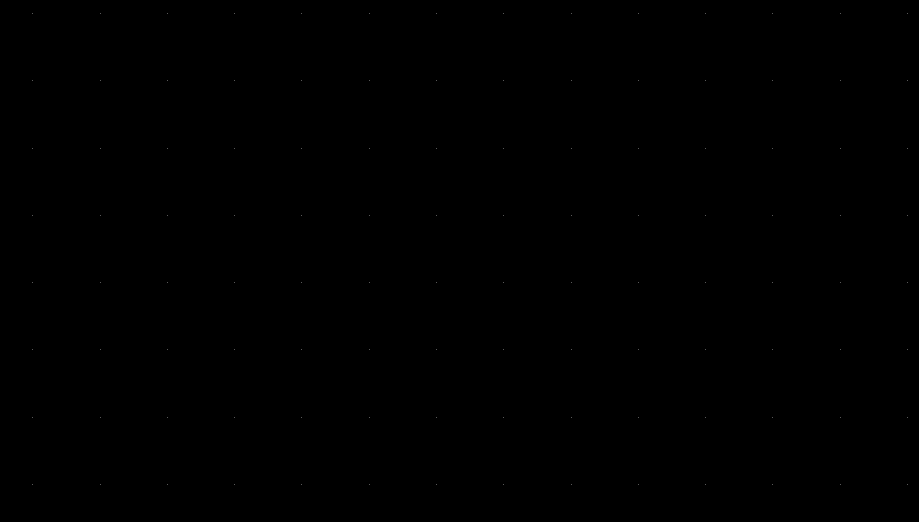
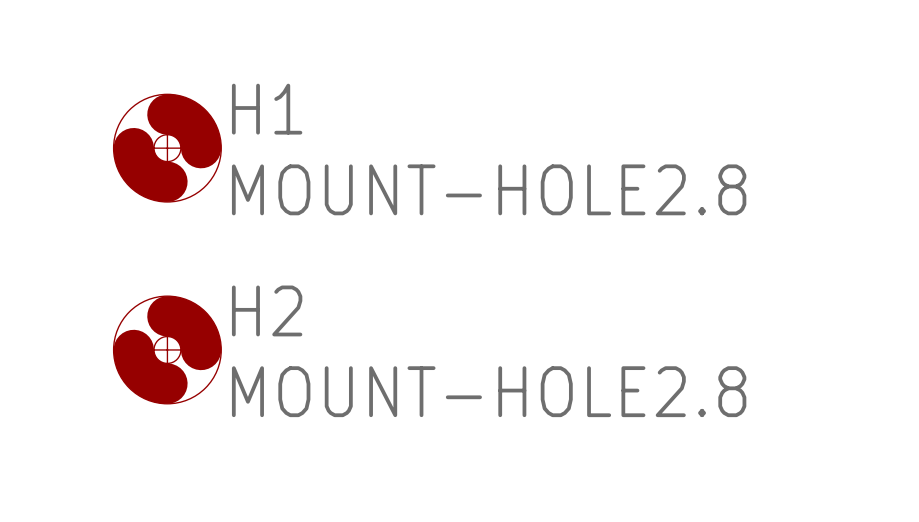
H1: none -> MOUNT-HOLE2.8 (167, 148)
H2: none -> MOUNT-HOLE2.8 (167, 349)

